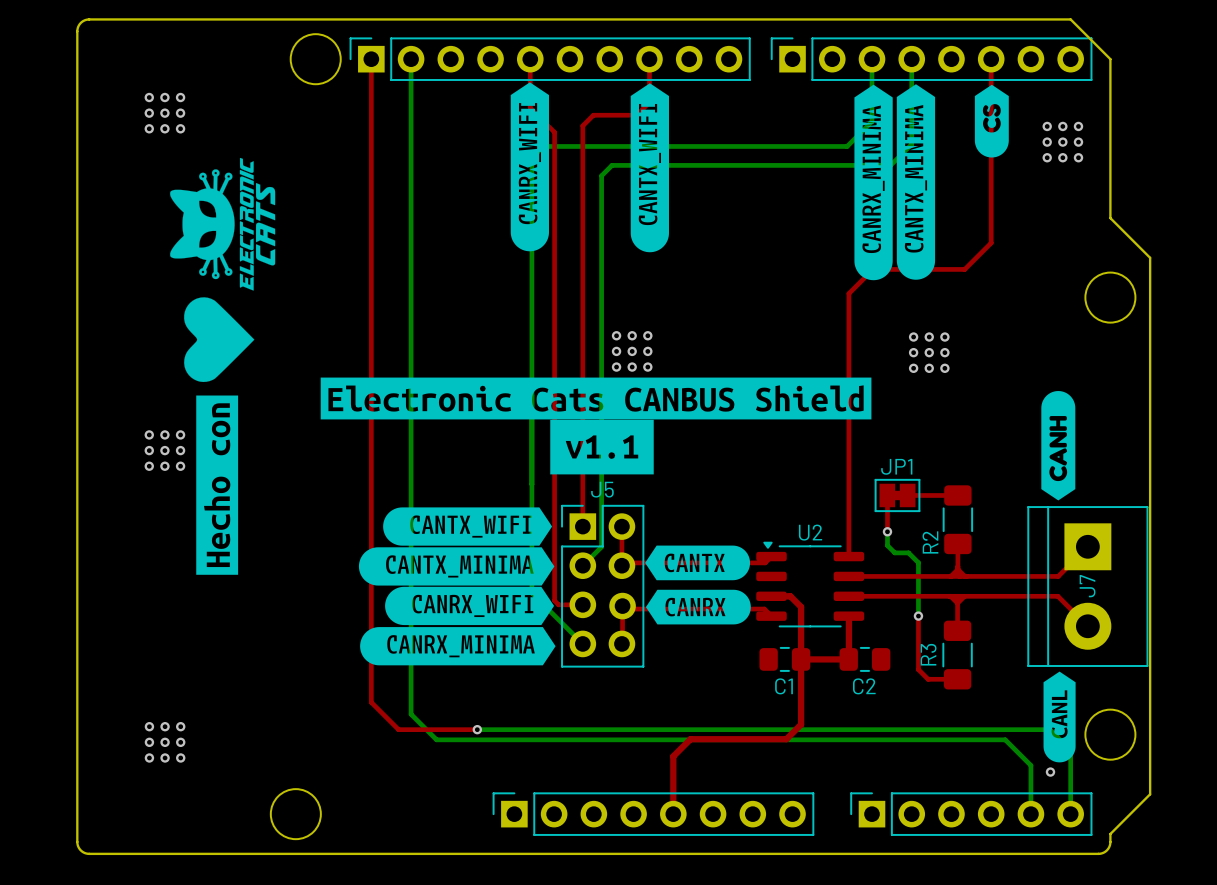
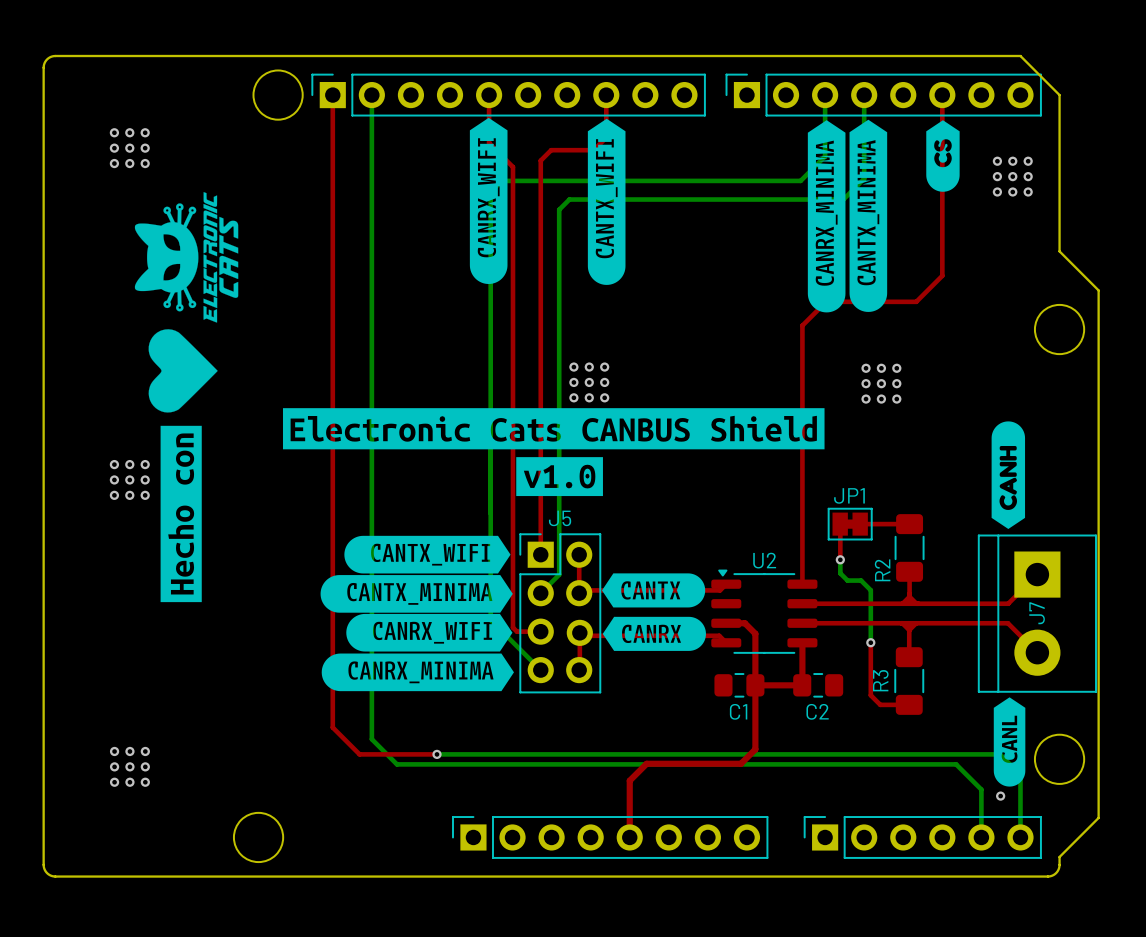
drawing shape: [550, 419, 654, 475] -> [516, 457, 603, 497]

